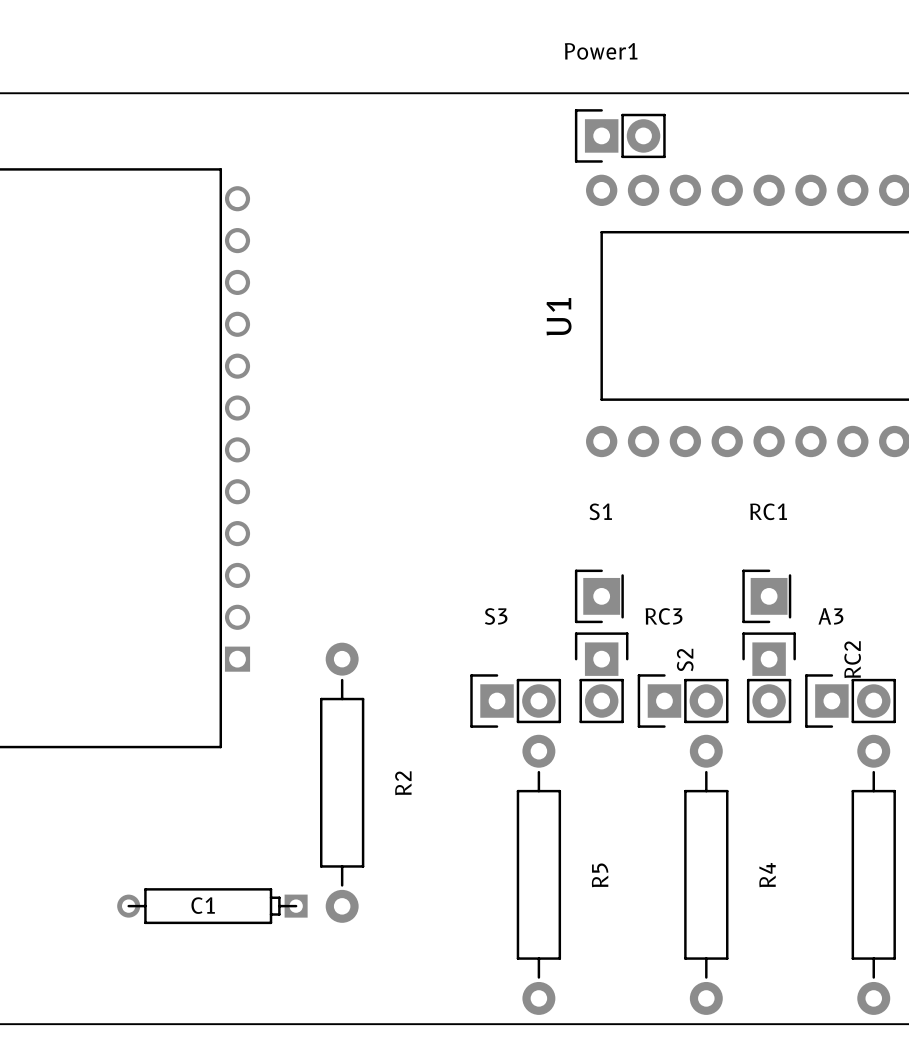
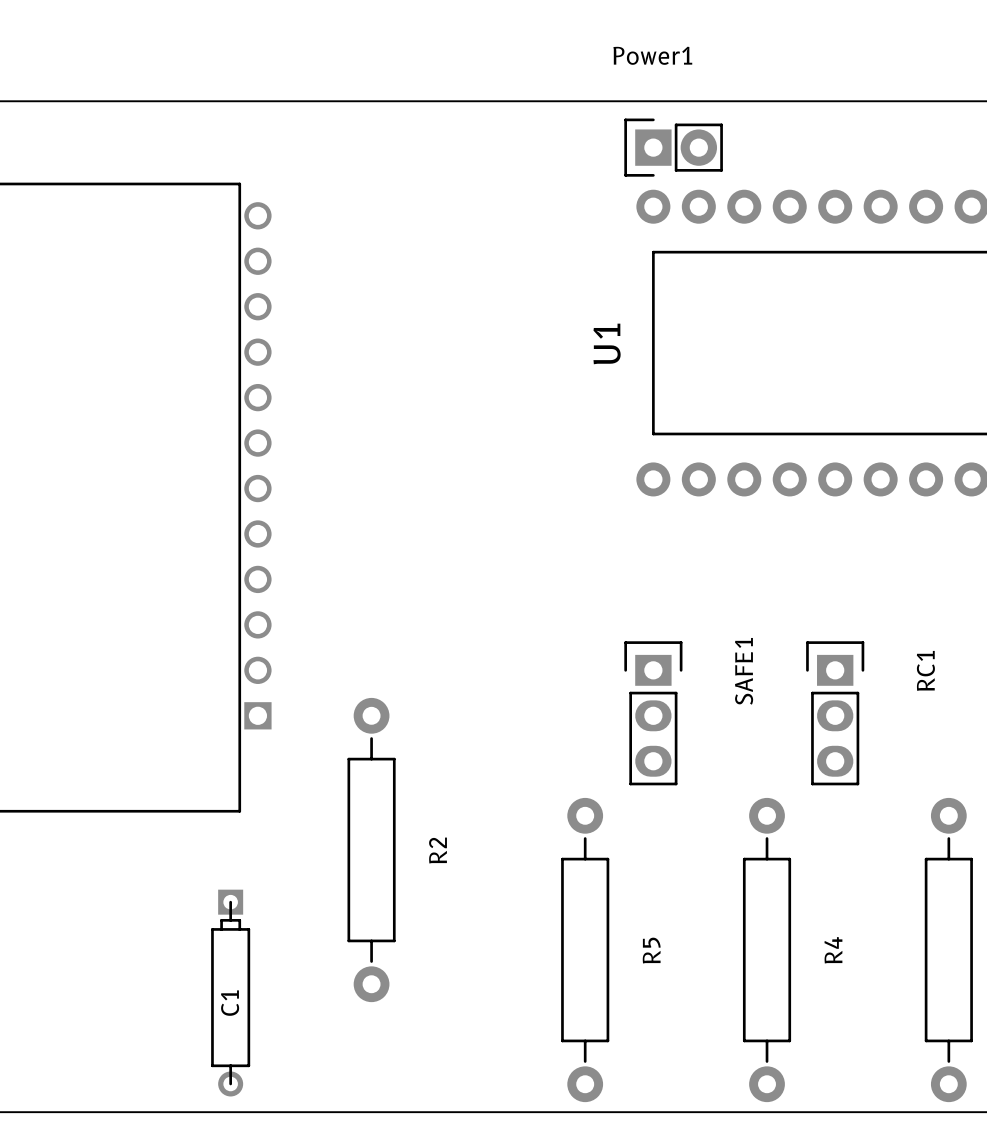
RC1 name position: RC1 (768, 511) -> RC1 (925, 670)
RC1 footprint: [742, 569, 792, 624] -> [806, 641, 865, 786]
S1: (599, 596) -> none
SAFE1: none -> (653, 713)
S2: (601, 677) -> none
RC2: (769, 677) -> none
S3: (515, 701) -> none
RC3: (683, 701) -> none
A3: (850, 701) -> none
C1 rotation: 0° (212, 906) -> 90° counterclockwise (230, 993)

